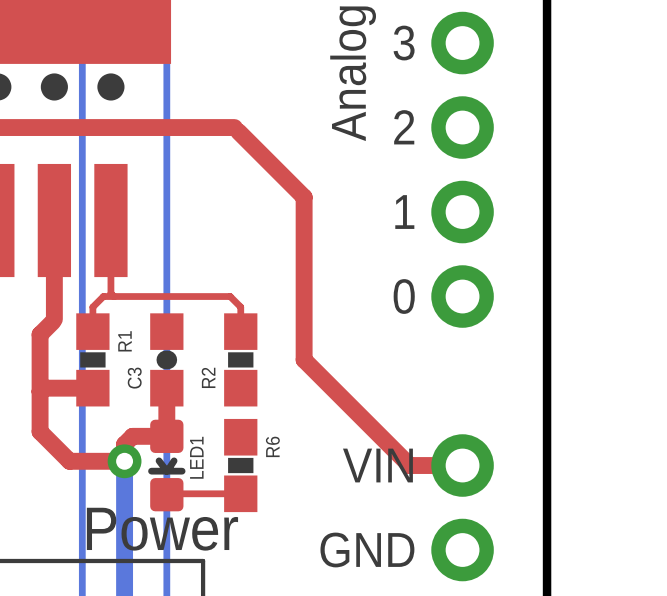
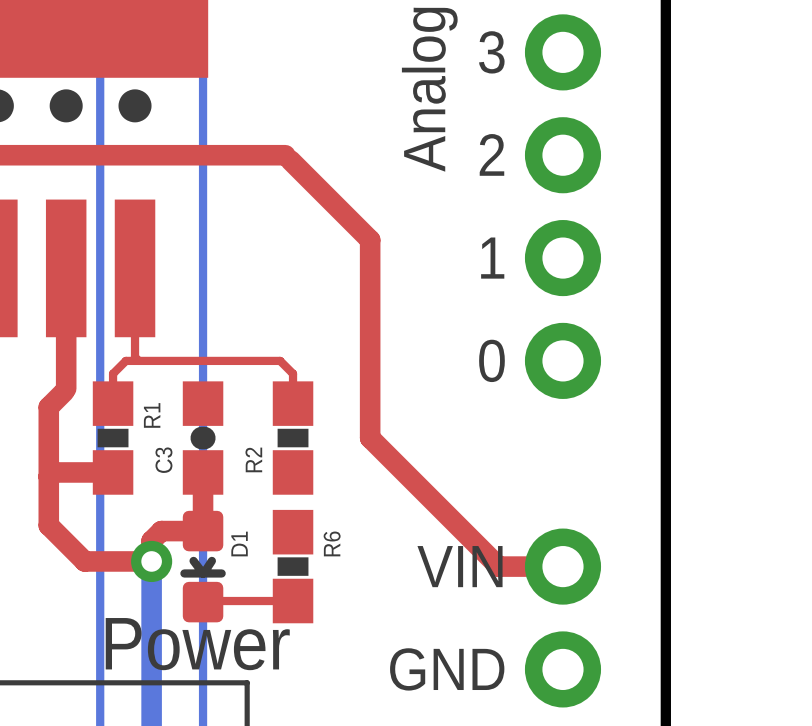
LED1 name: LED1 (196, 457) -> D1 (239, 544)

